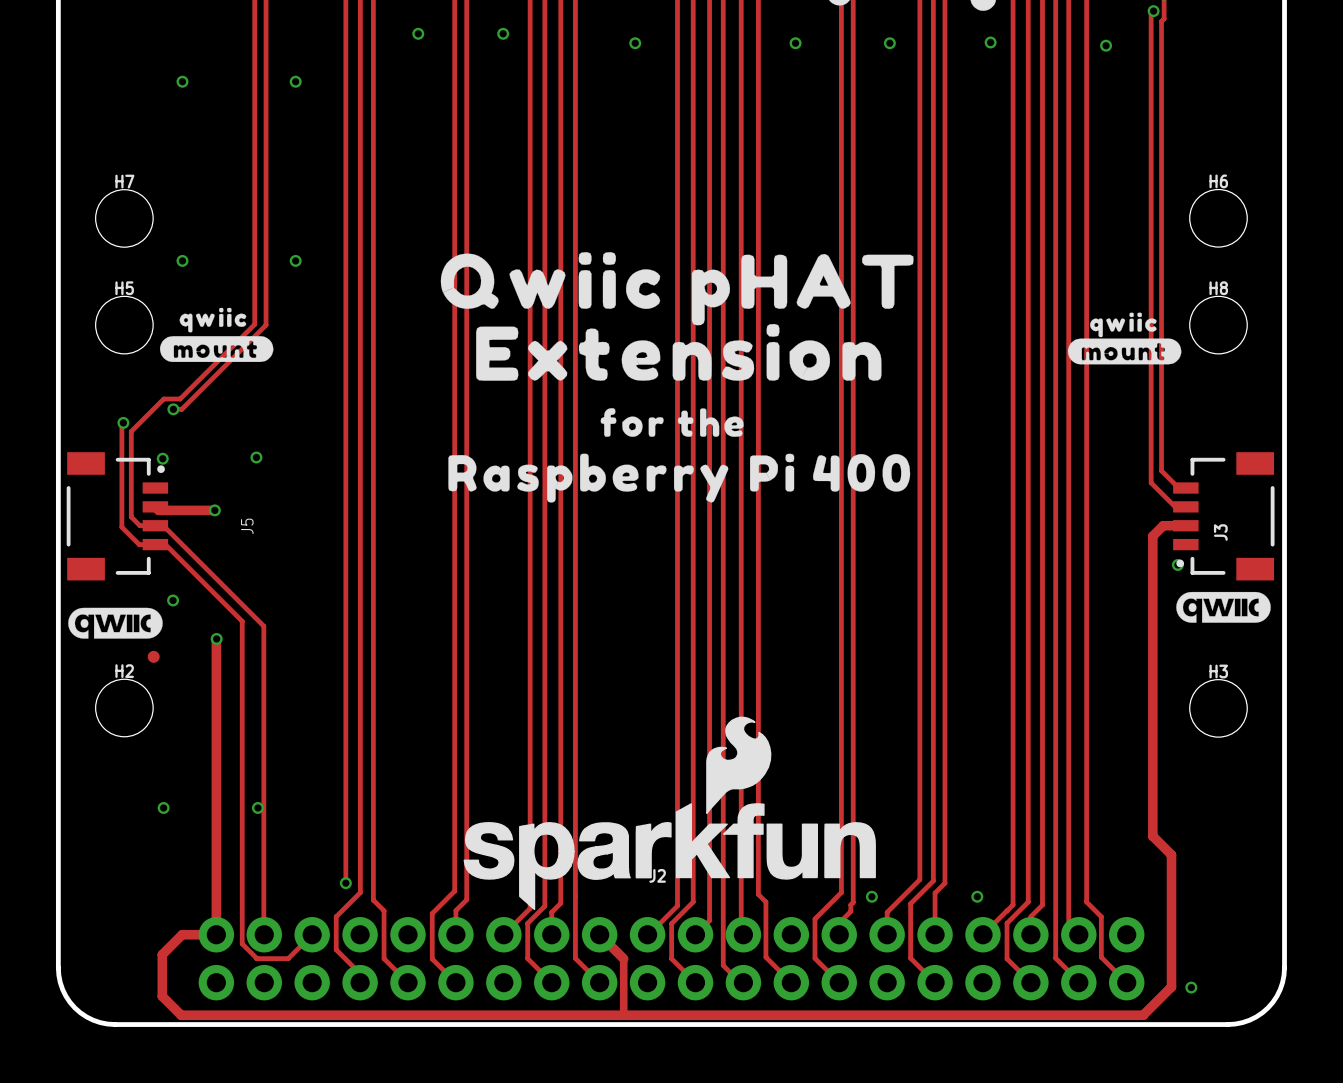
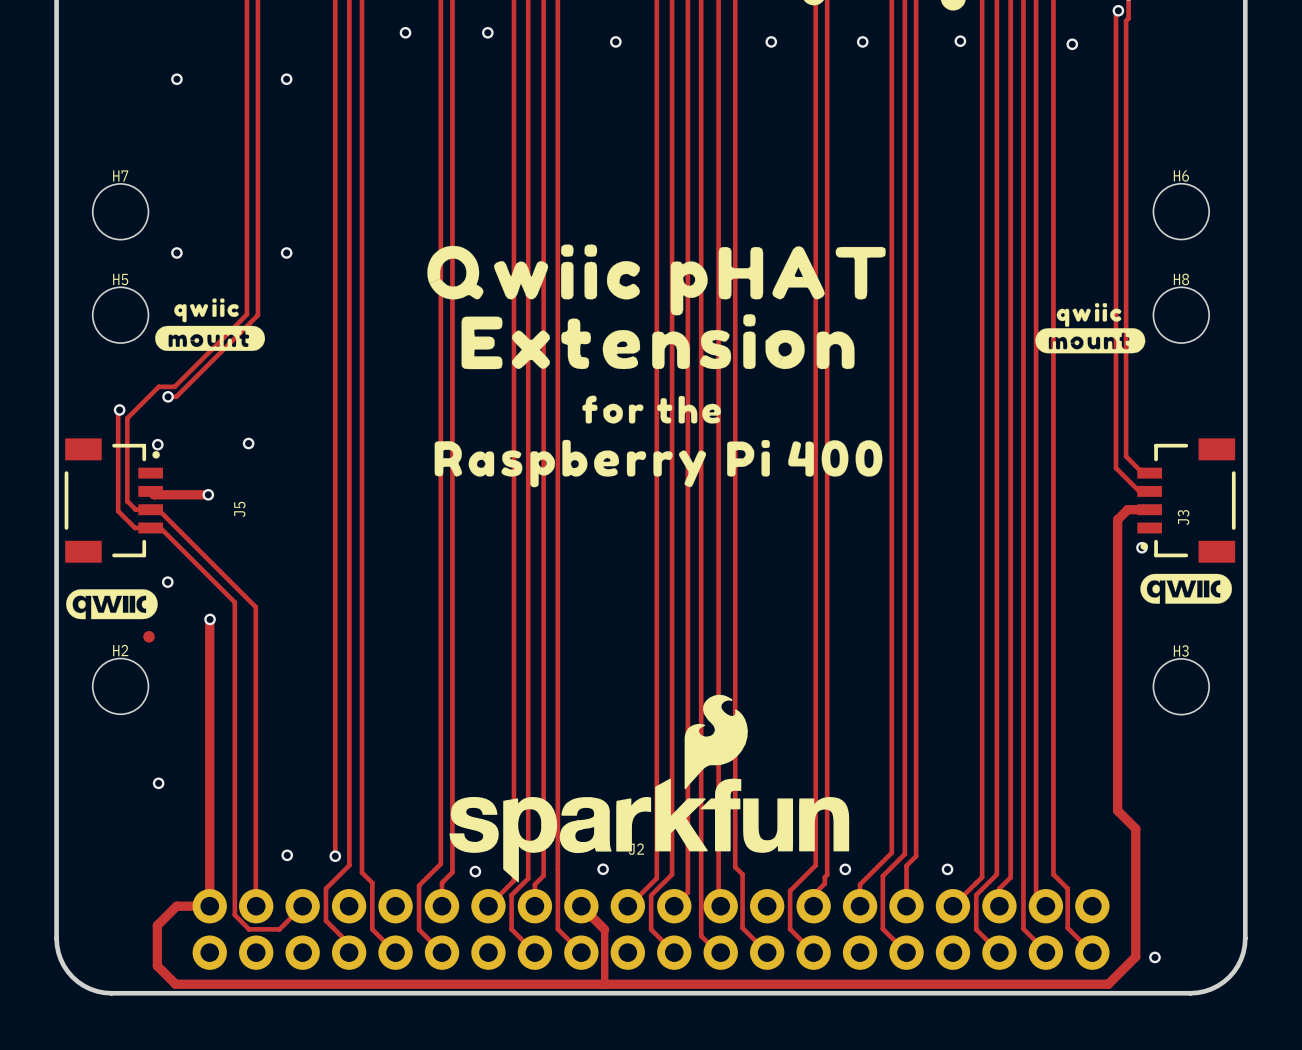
via position: (257, 807) -> (287, 855)
via: none -> (603, 869)
via: none -> (475, 871)

